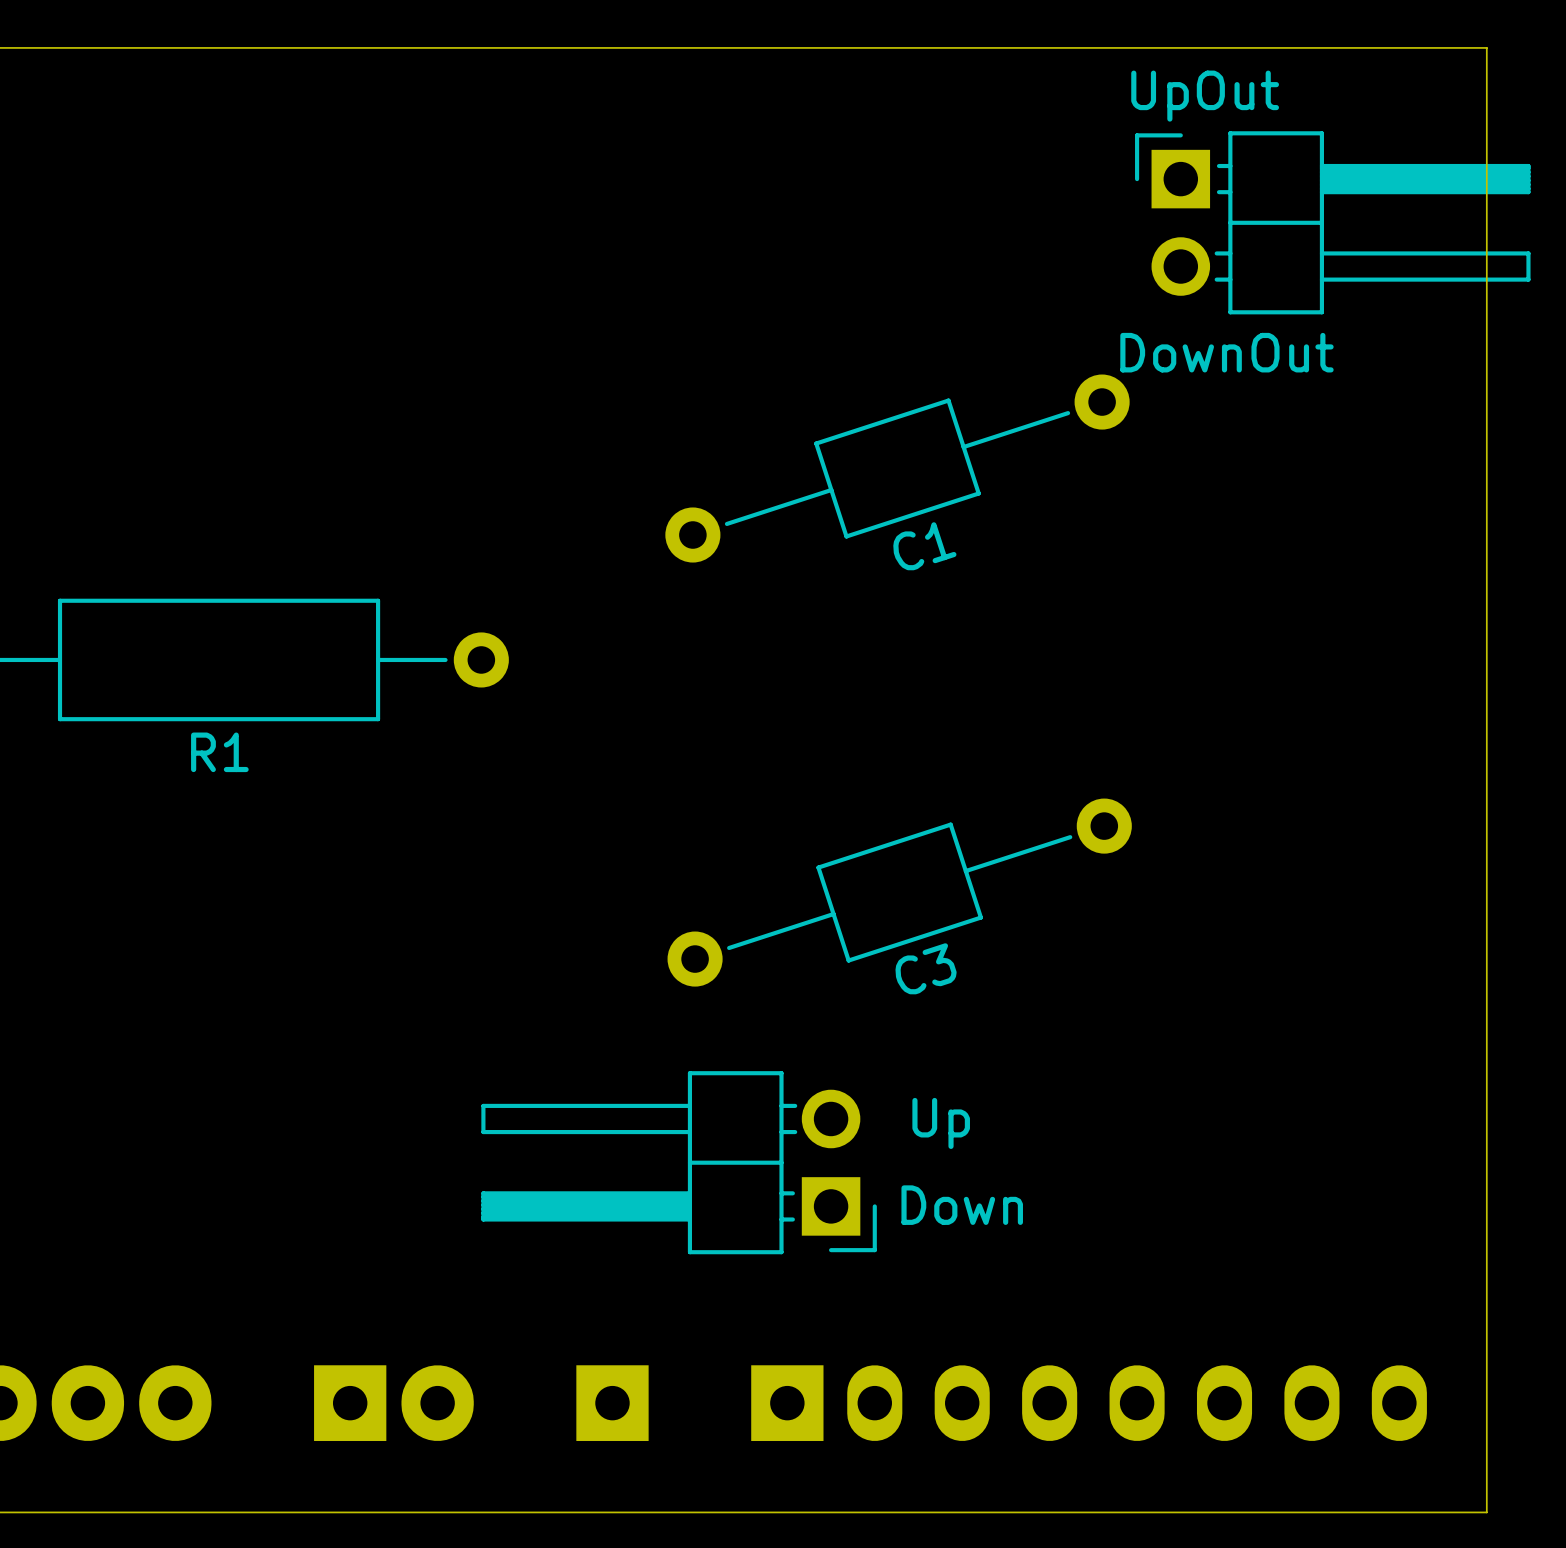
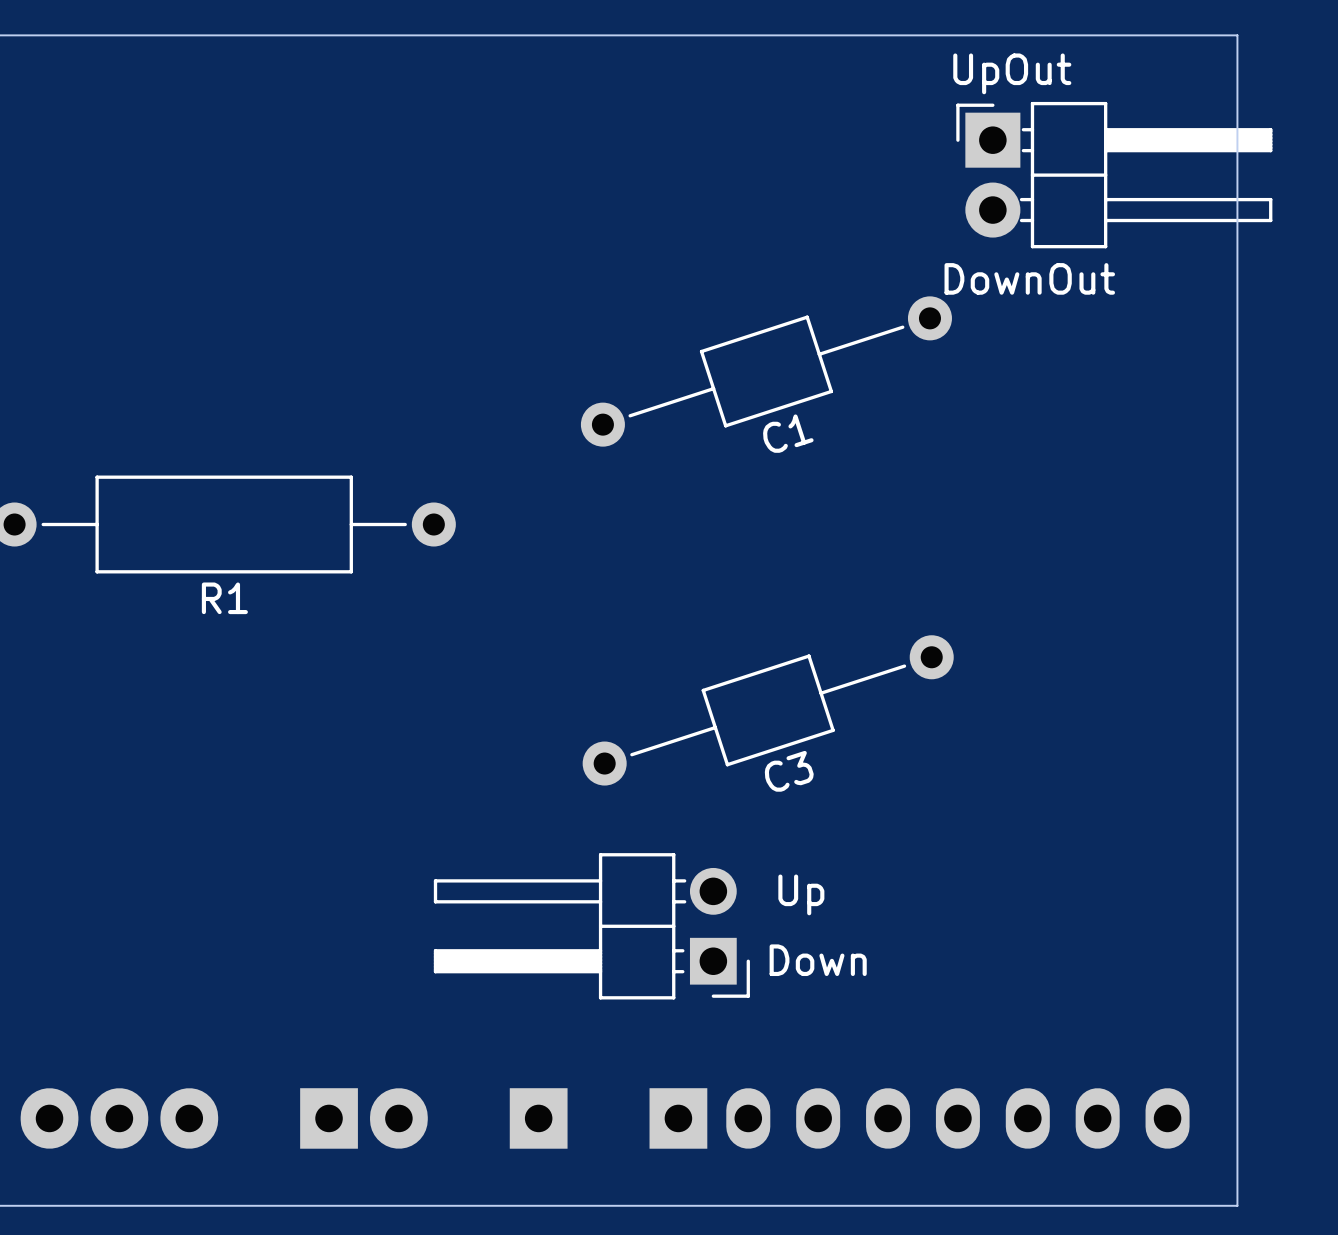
part footprint: [1135, 131, 1531, 315] -> [956, 101, 1273, 249]

